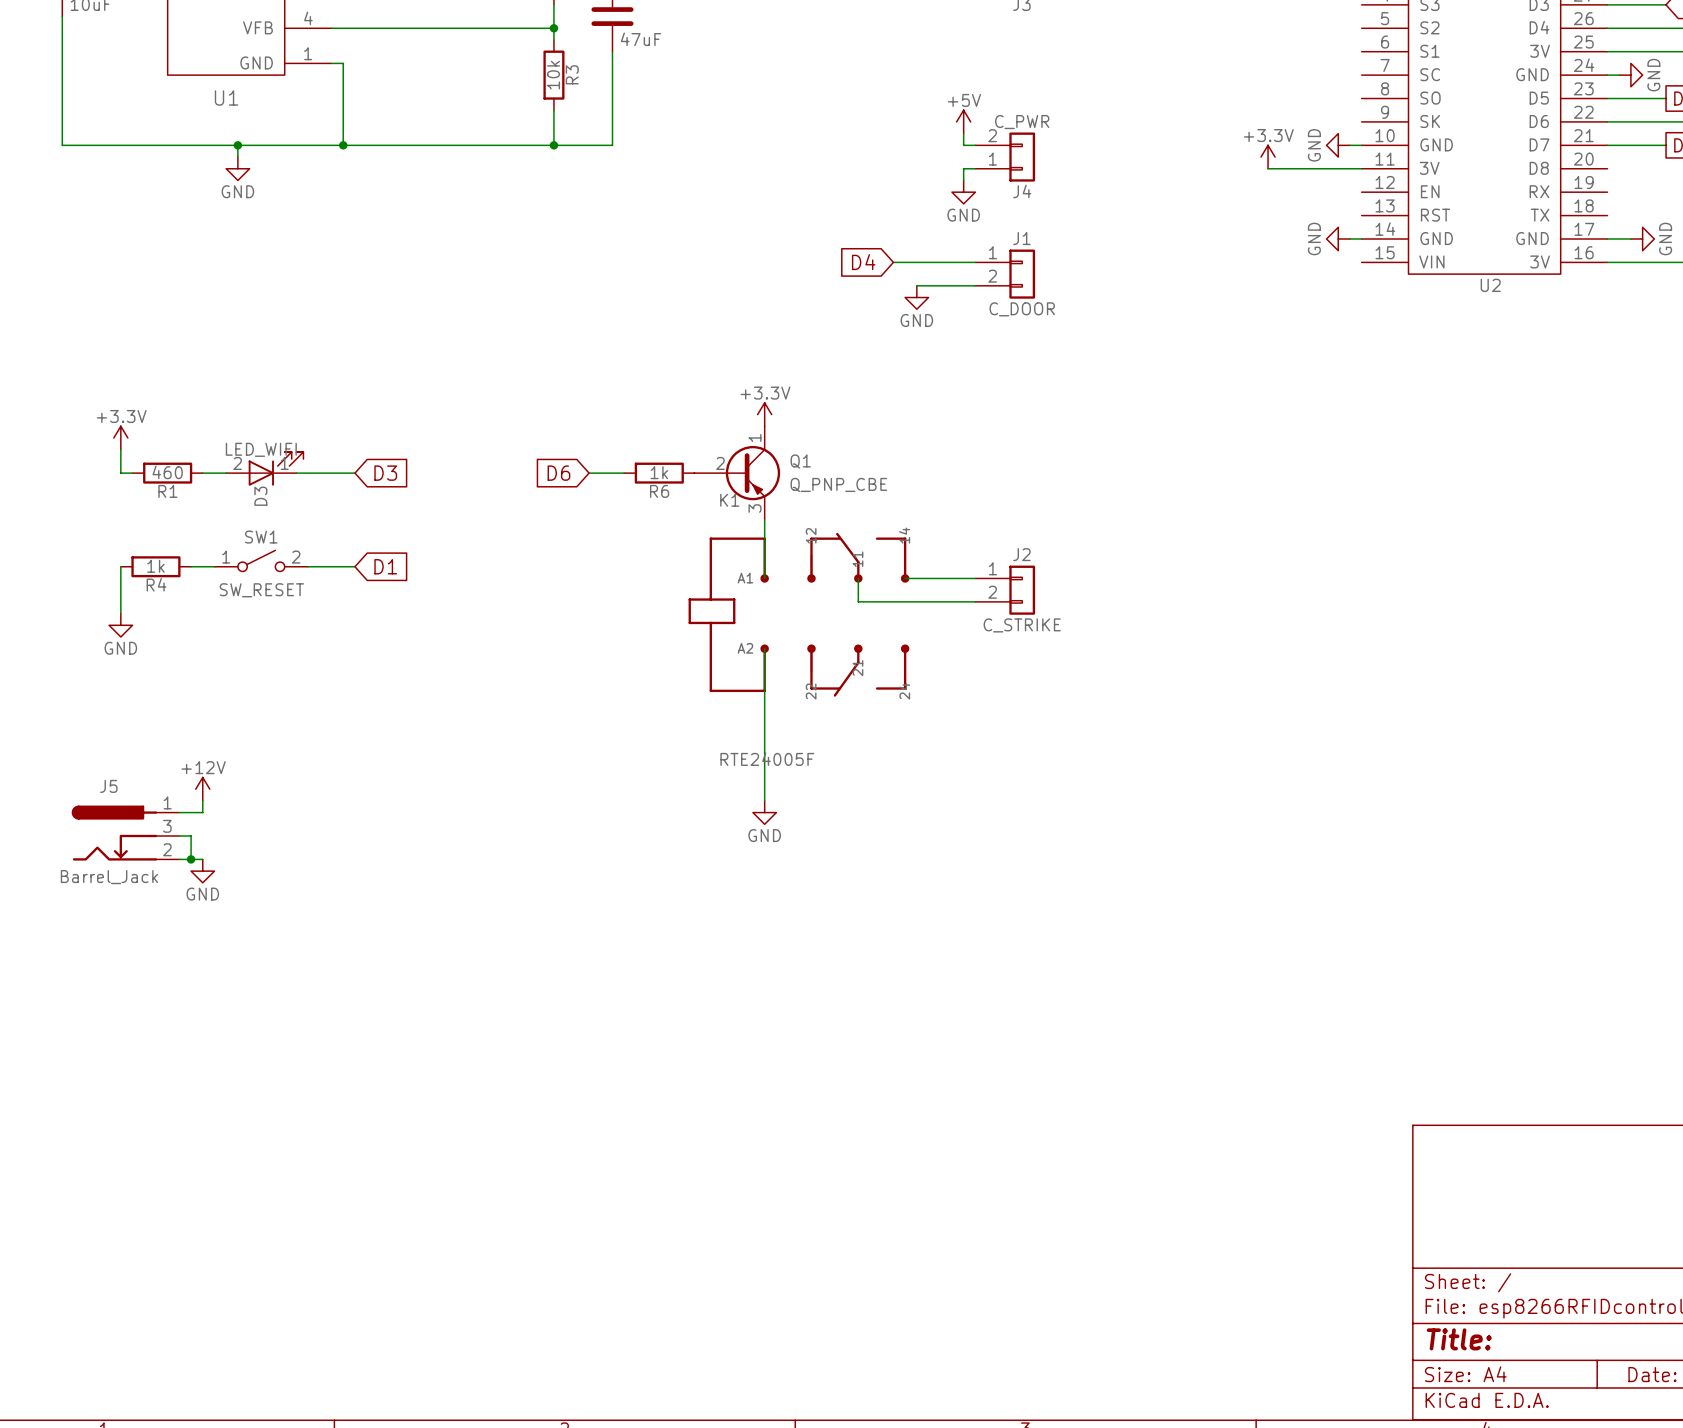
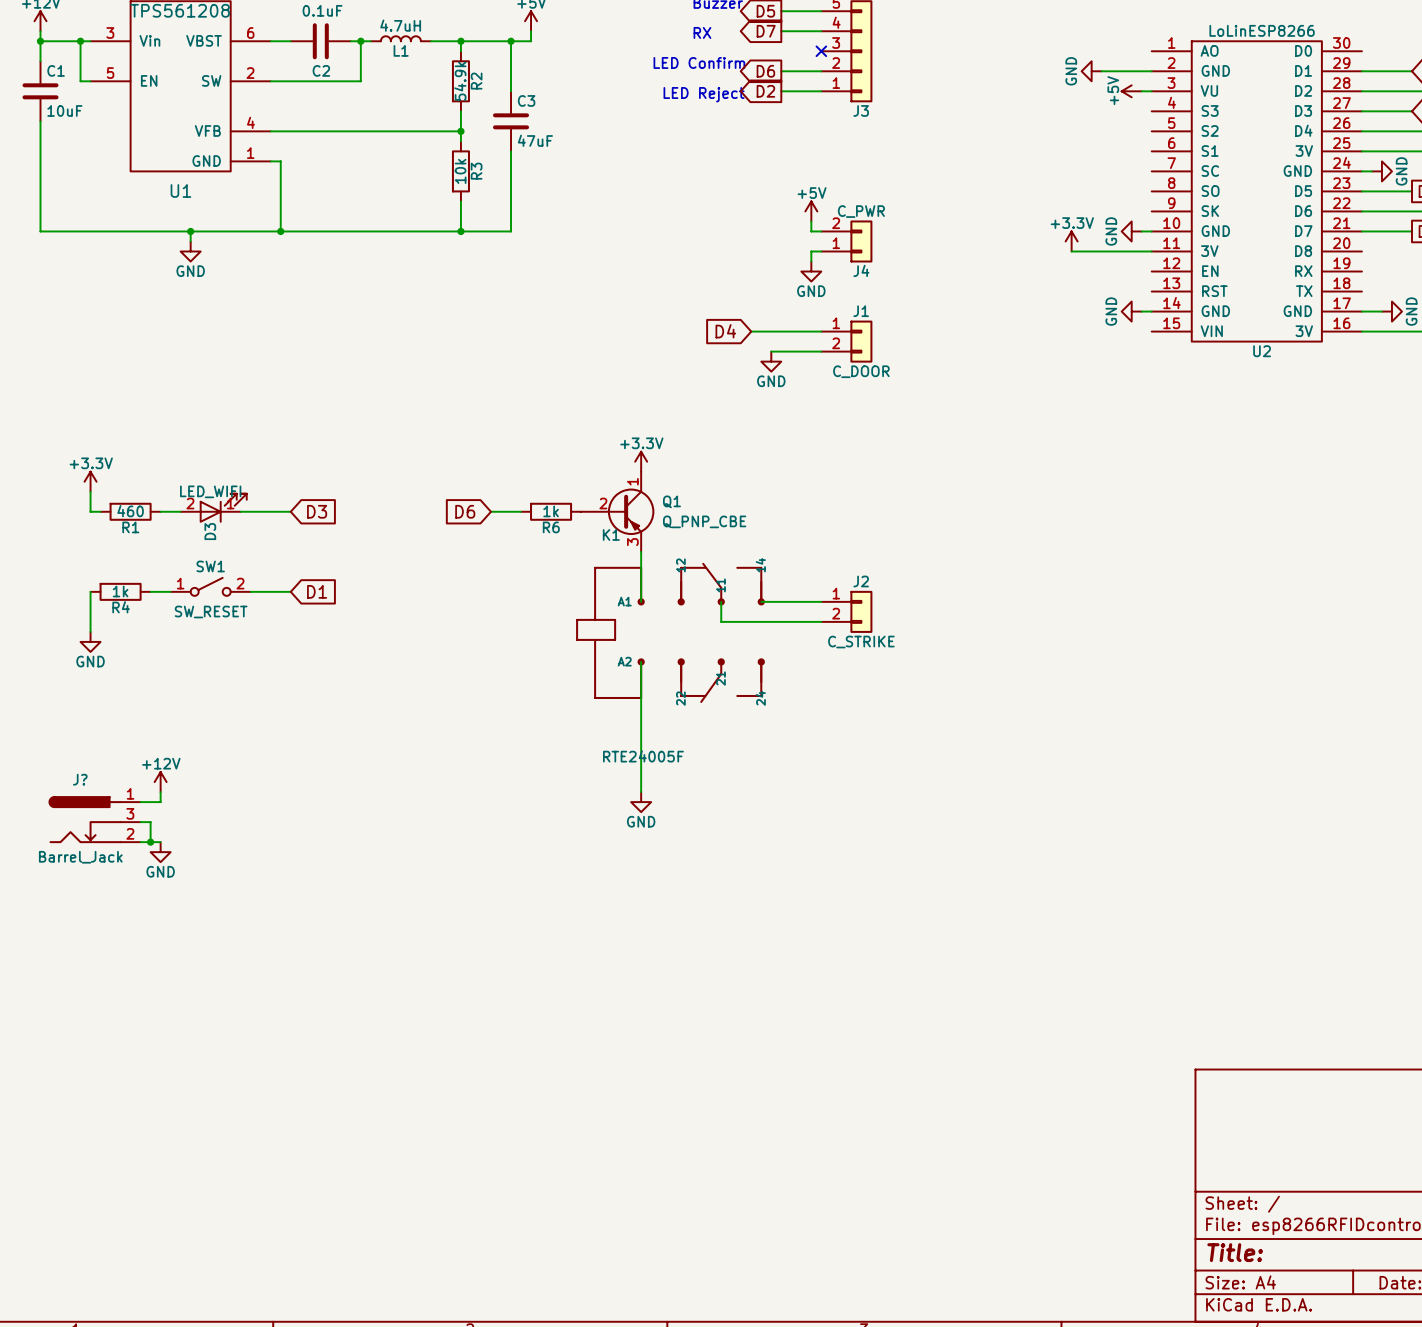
J5 name: J5 (108, 786) -> J? (80, 779)

